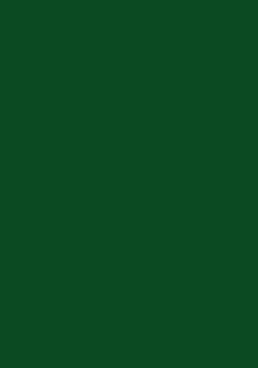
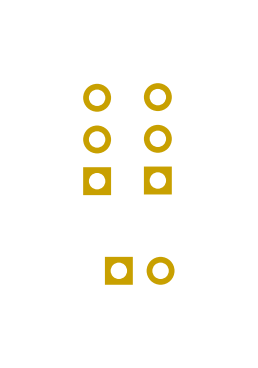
part: none -> (157, 138)
part: none -> (97, 139)
part: none -> (139, 270)

